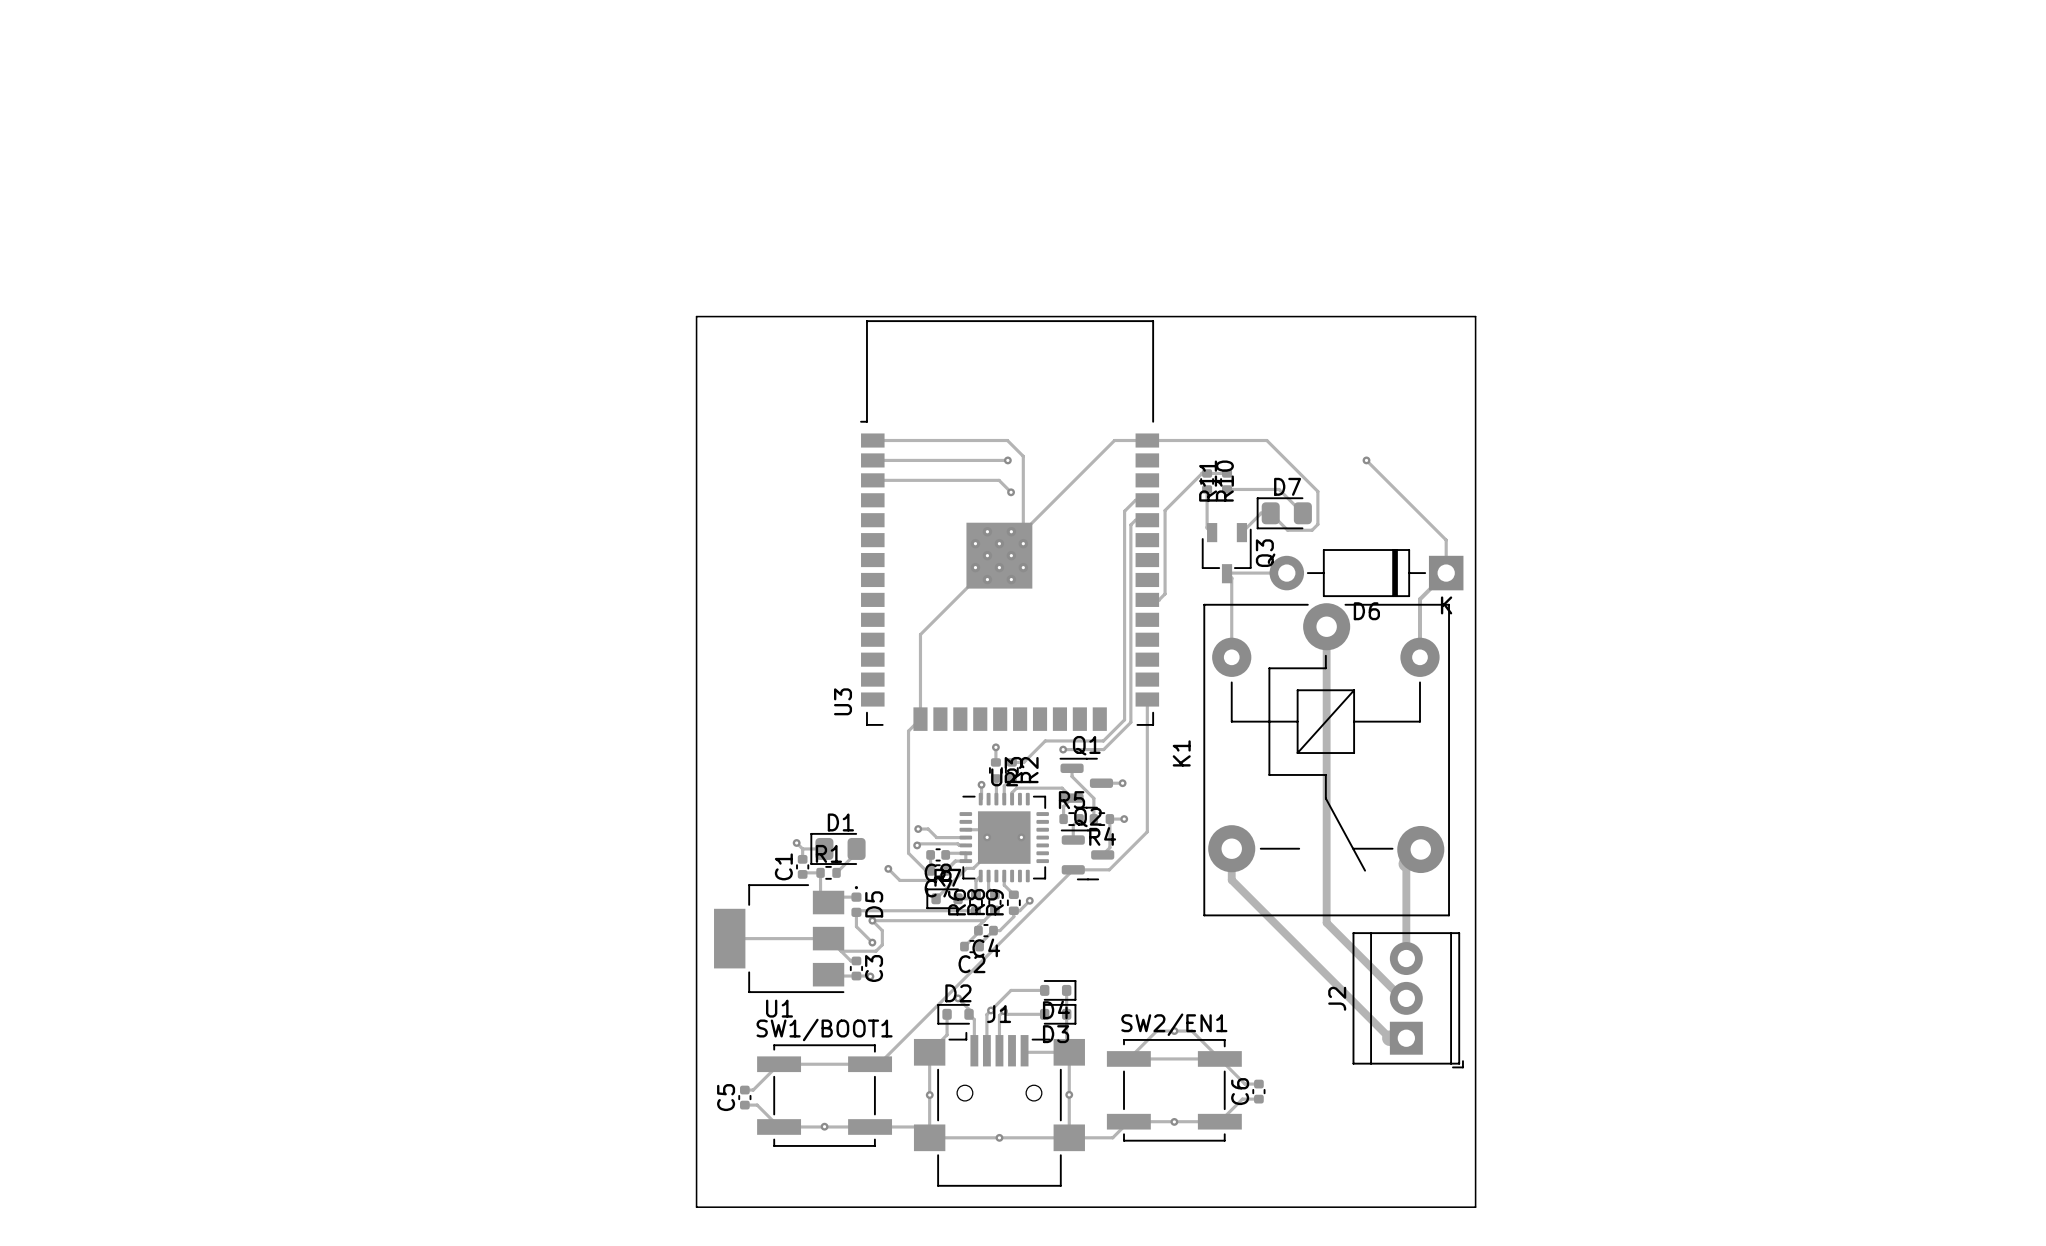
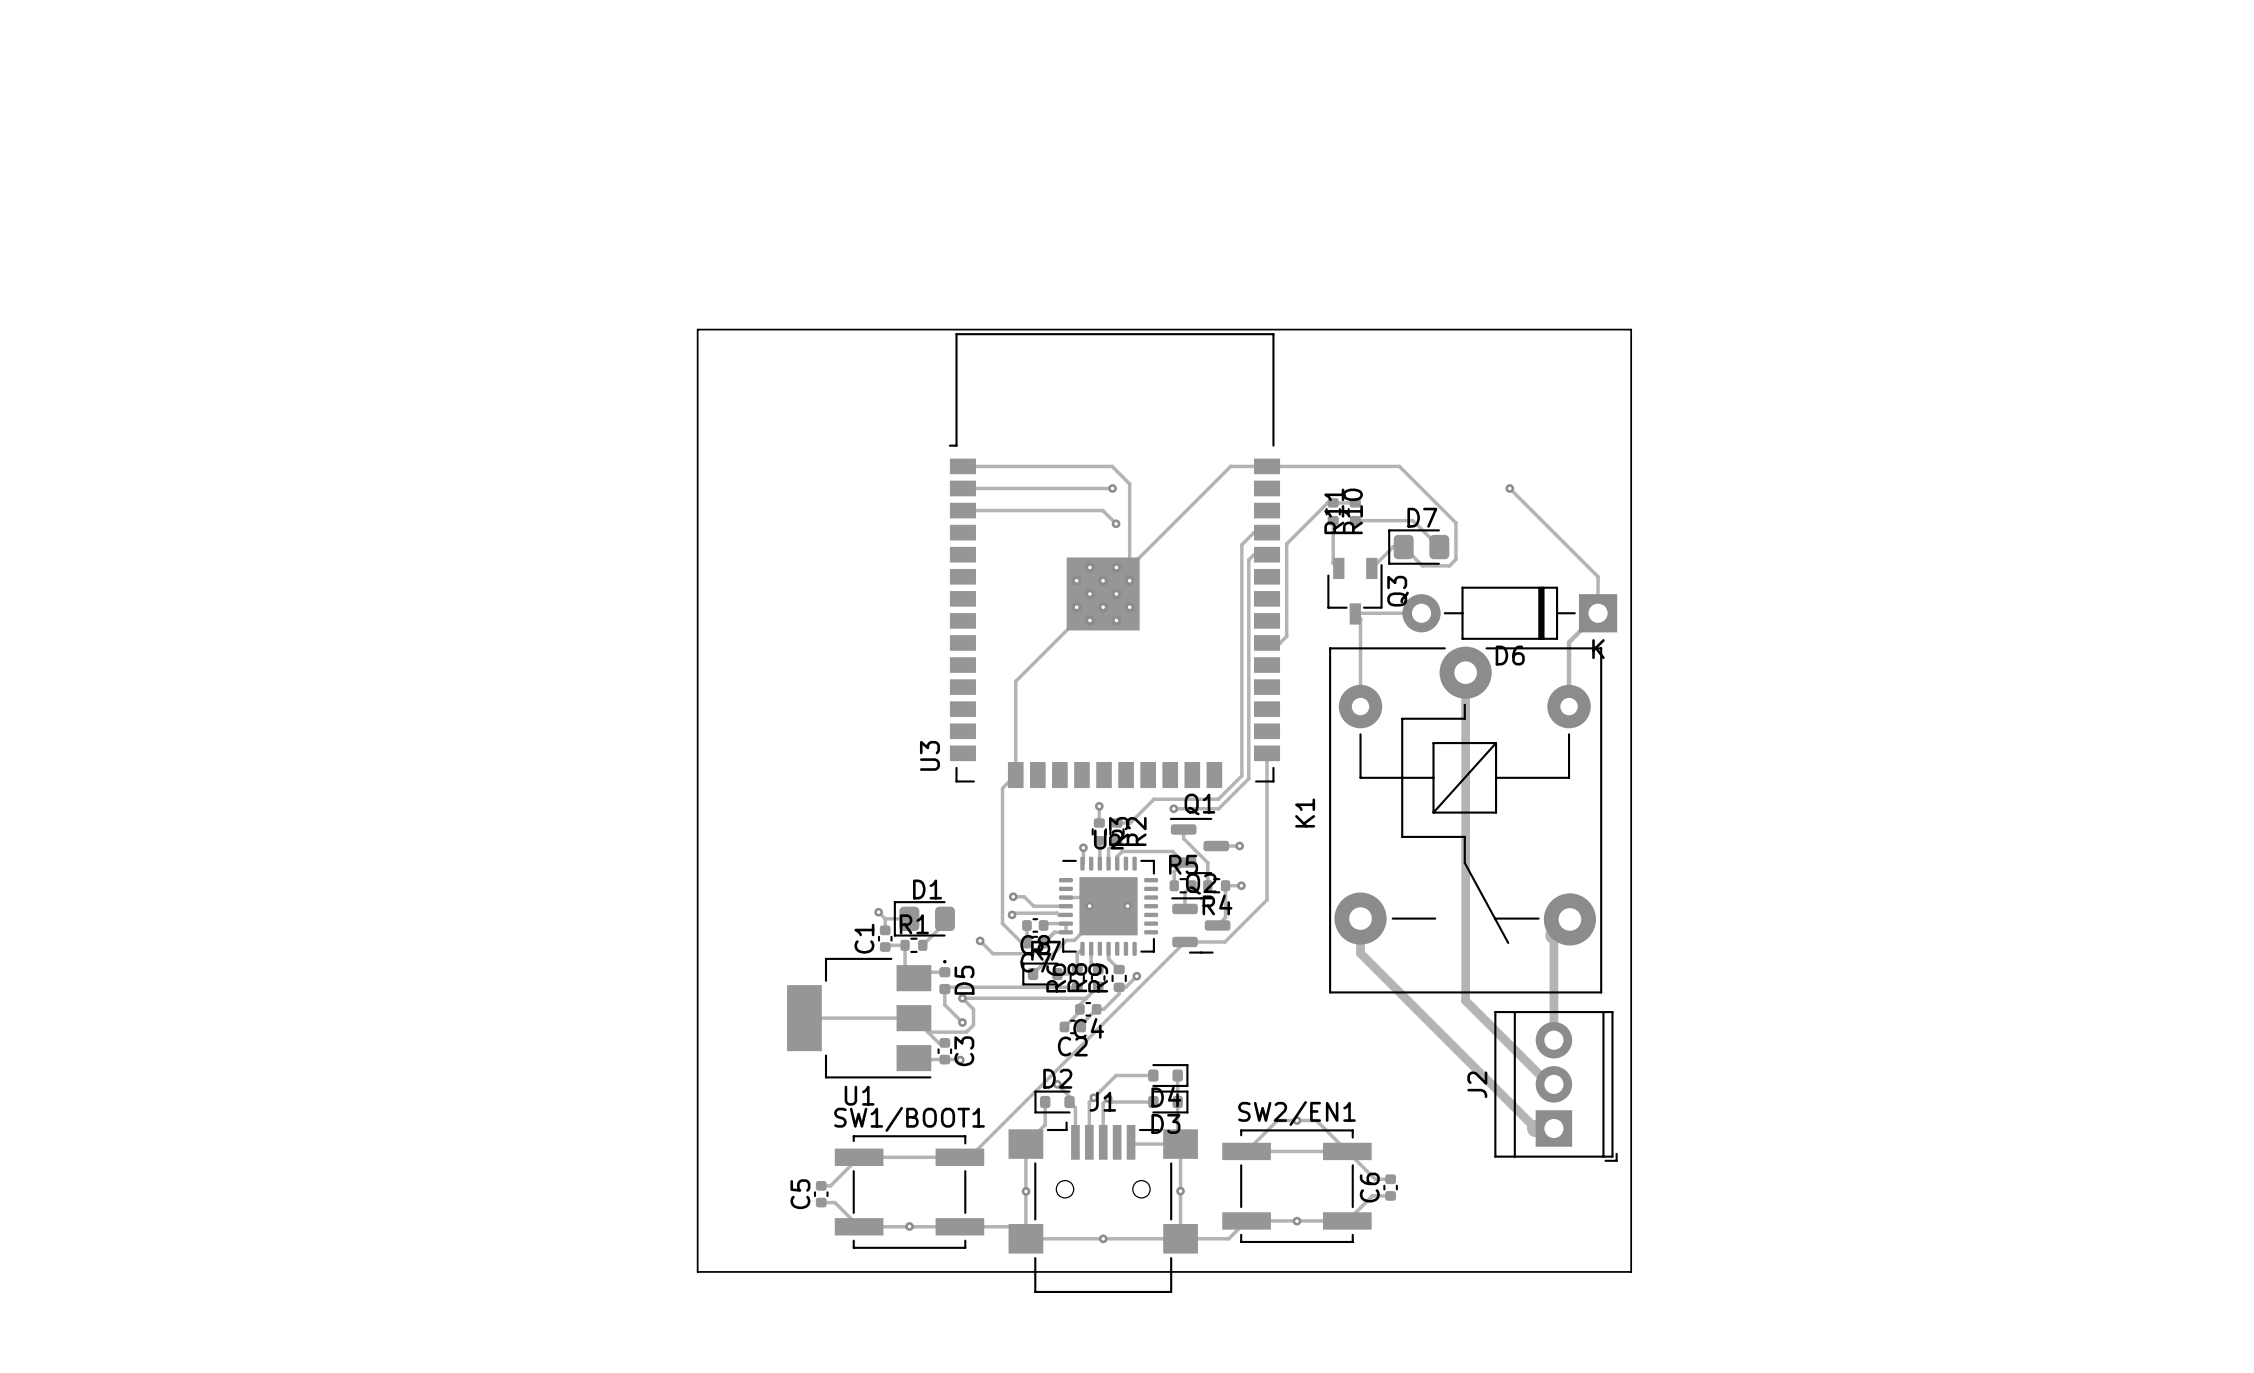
board edge: (696, 316) (1475, 316) (1475, 1207) (696, 1207) (696, 316) -> (697, 329) (697, 1271) (1631, 1271) (1631, 329) (697, 329)

